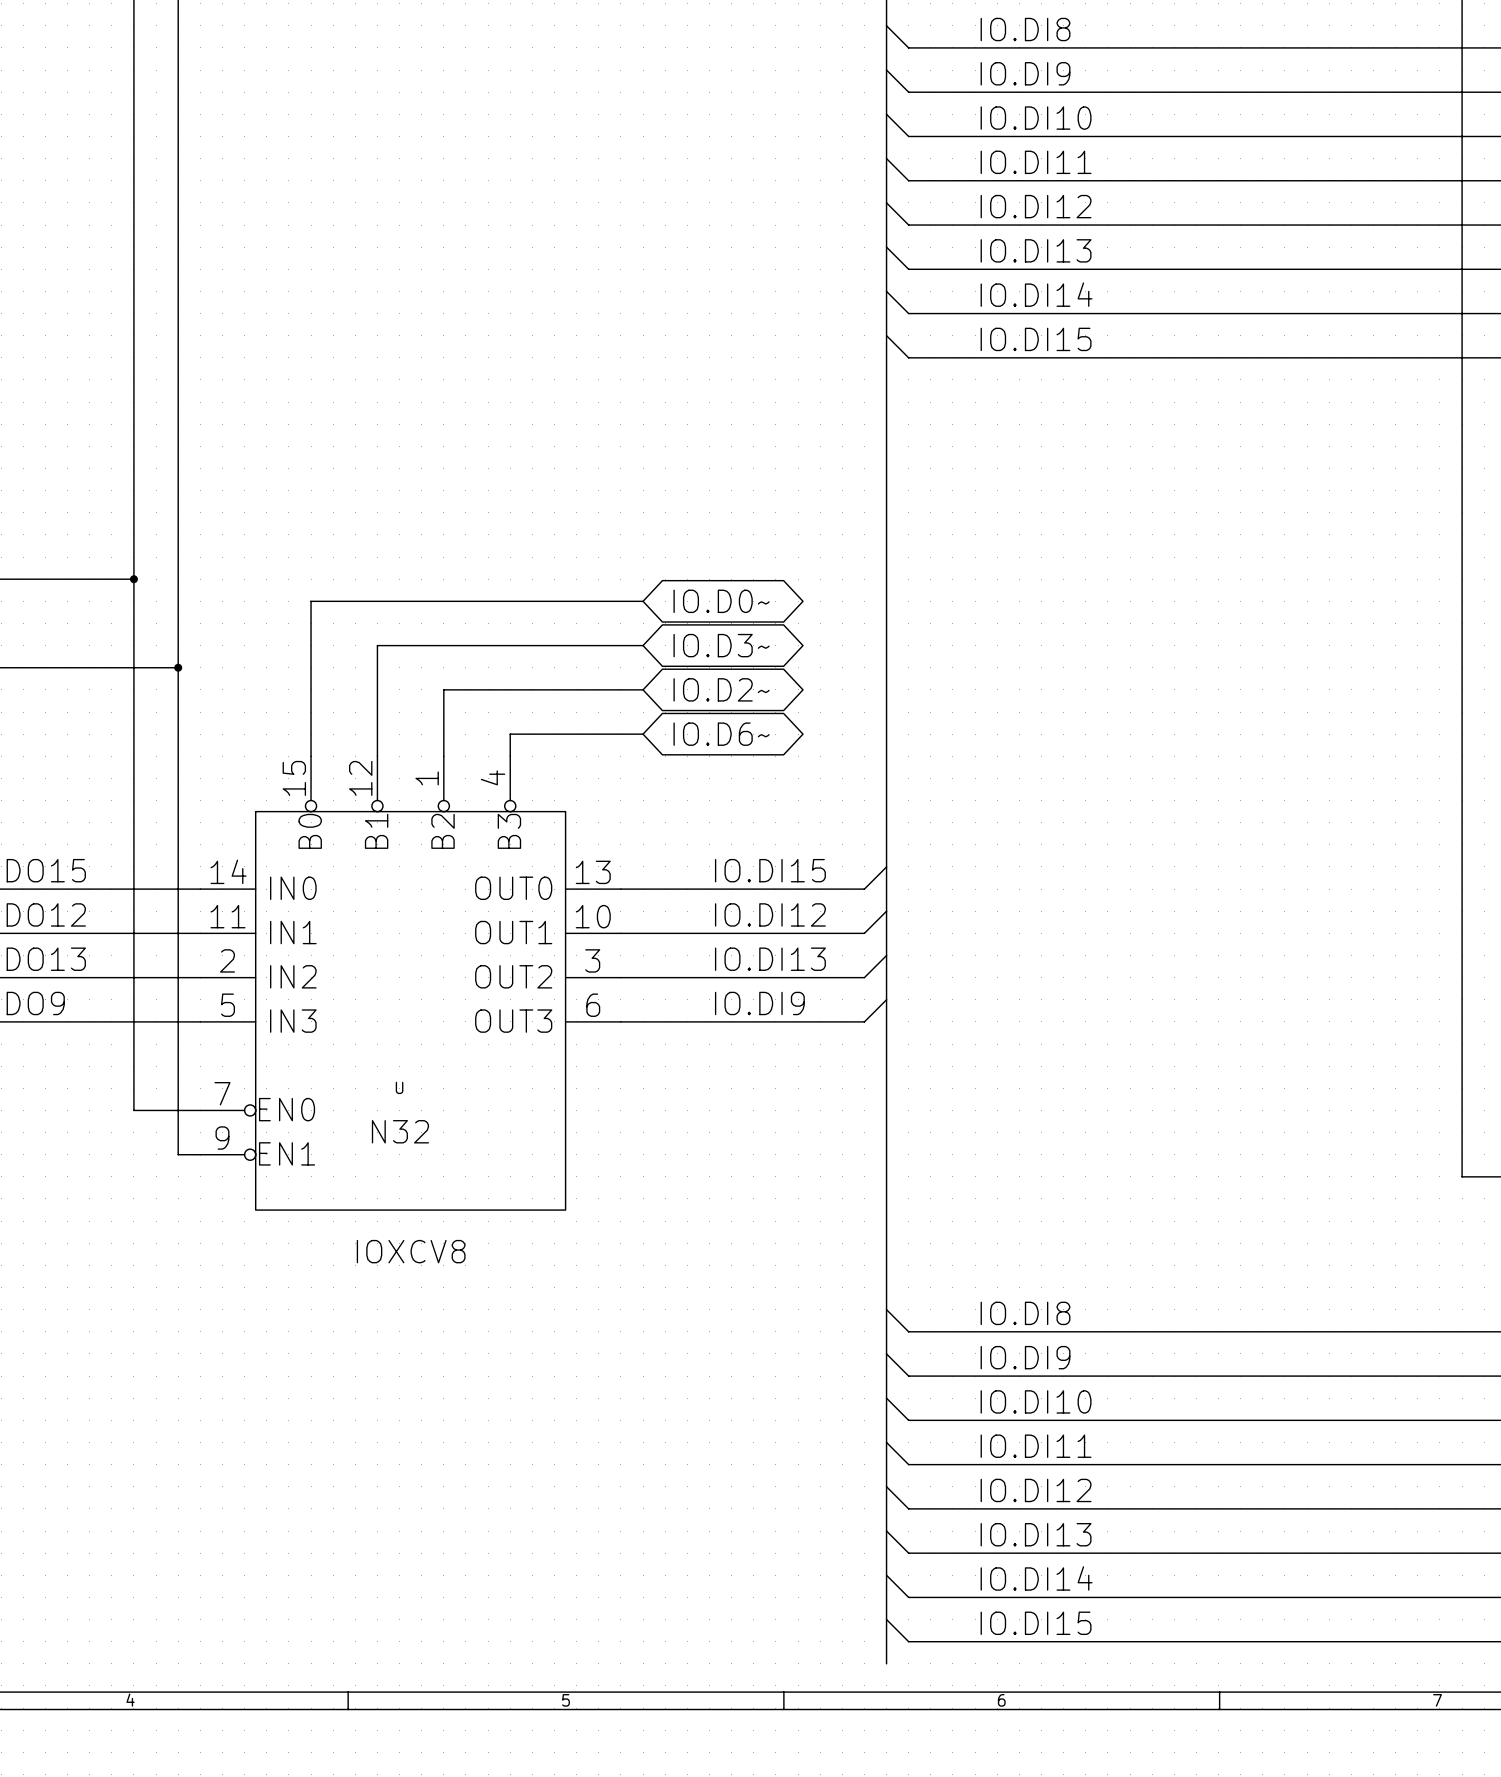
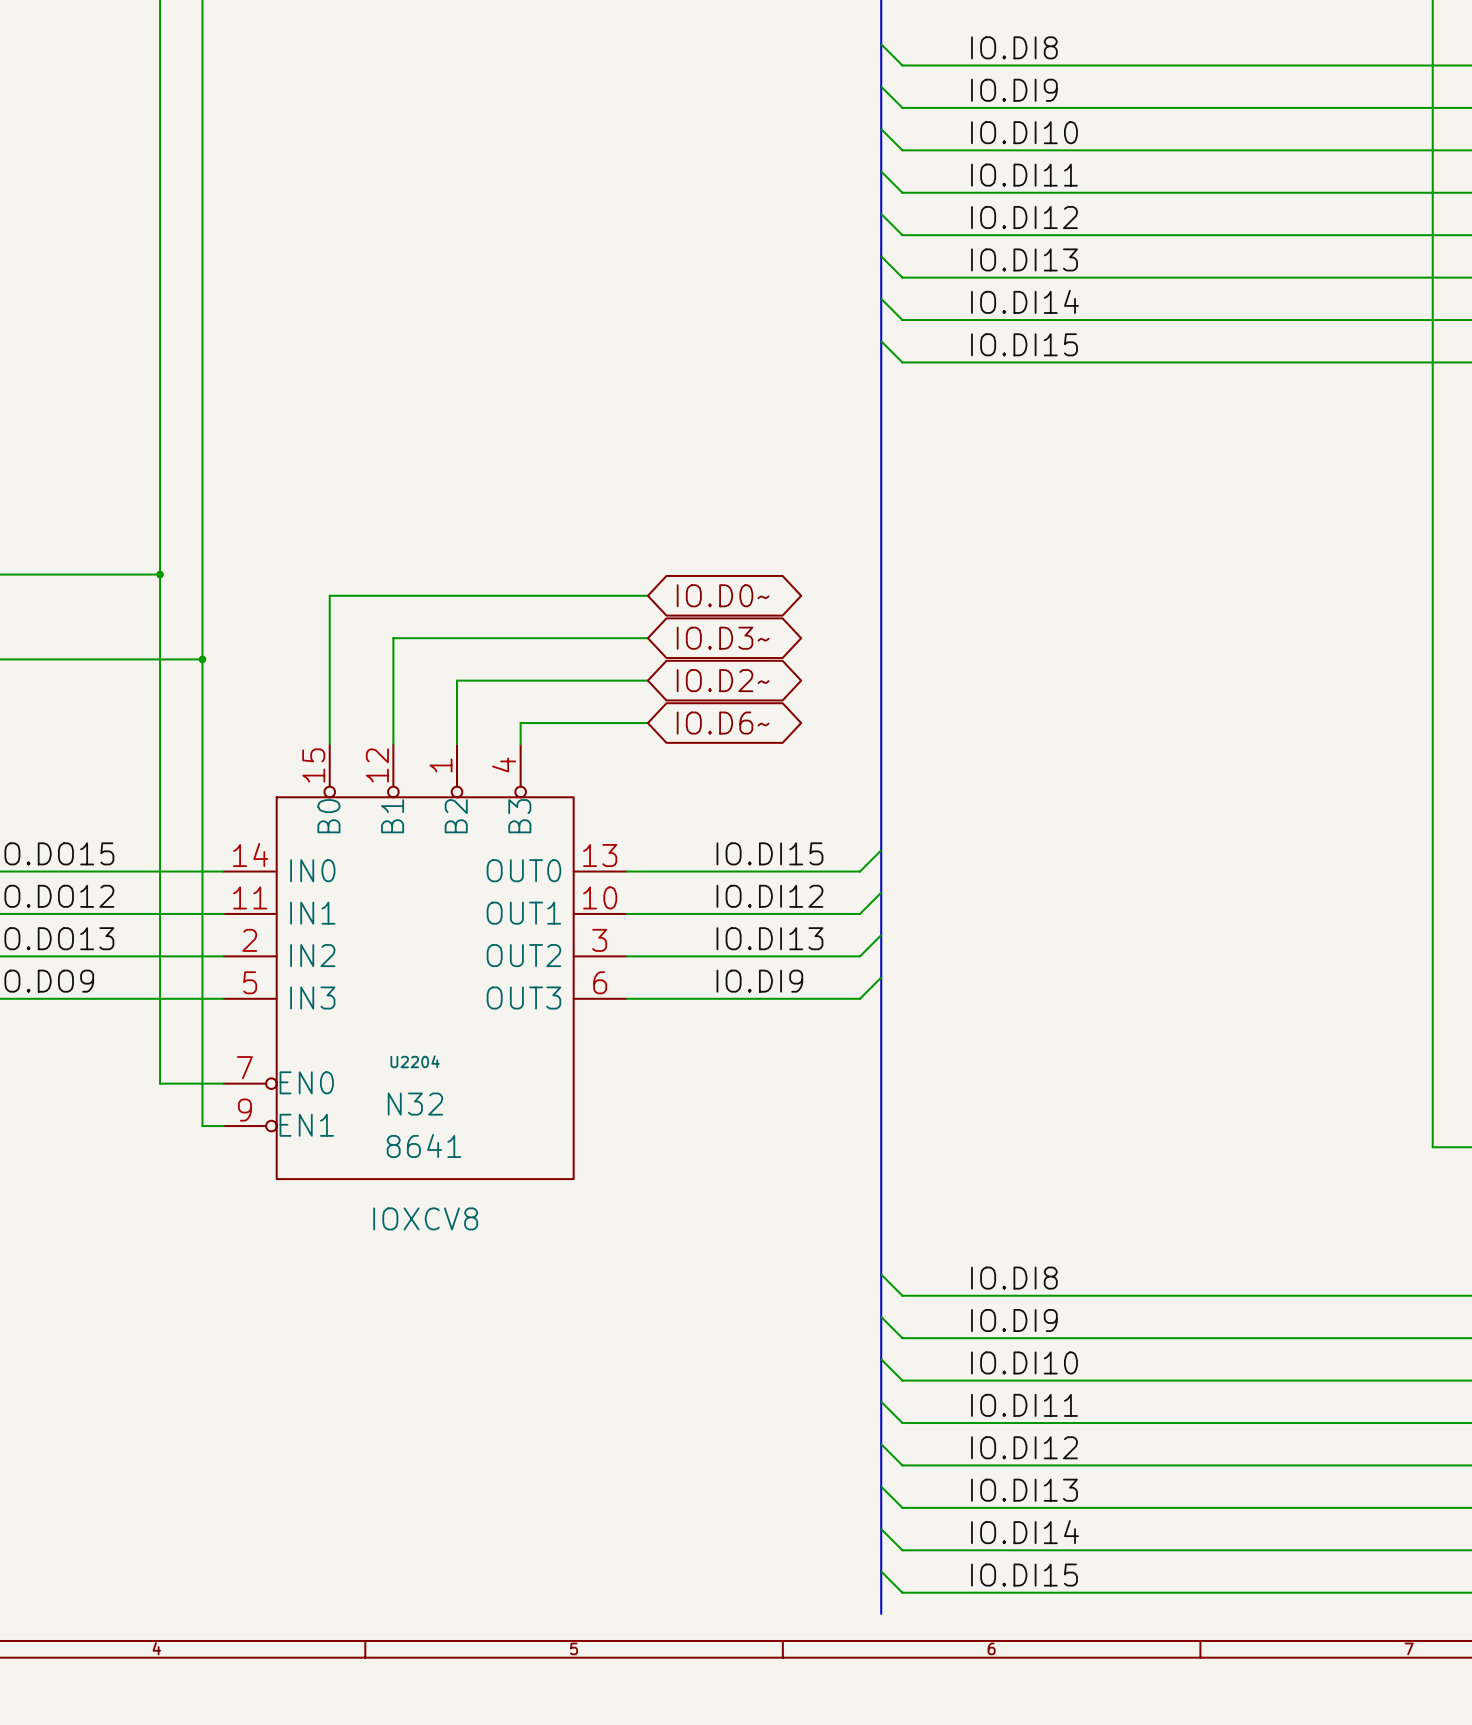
U name: U (399, 1087) -> U2204 (415, 1061)
U value: none -> 8641 (424, 1145)

